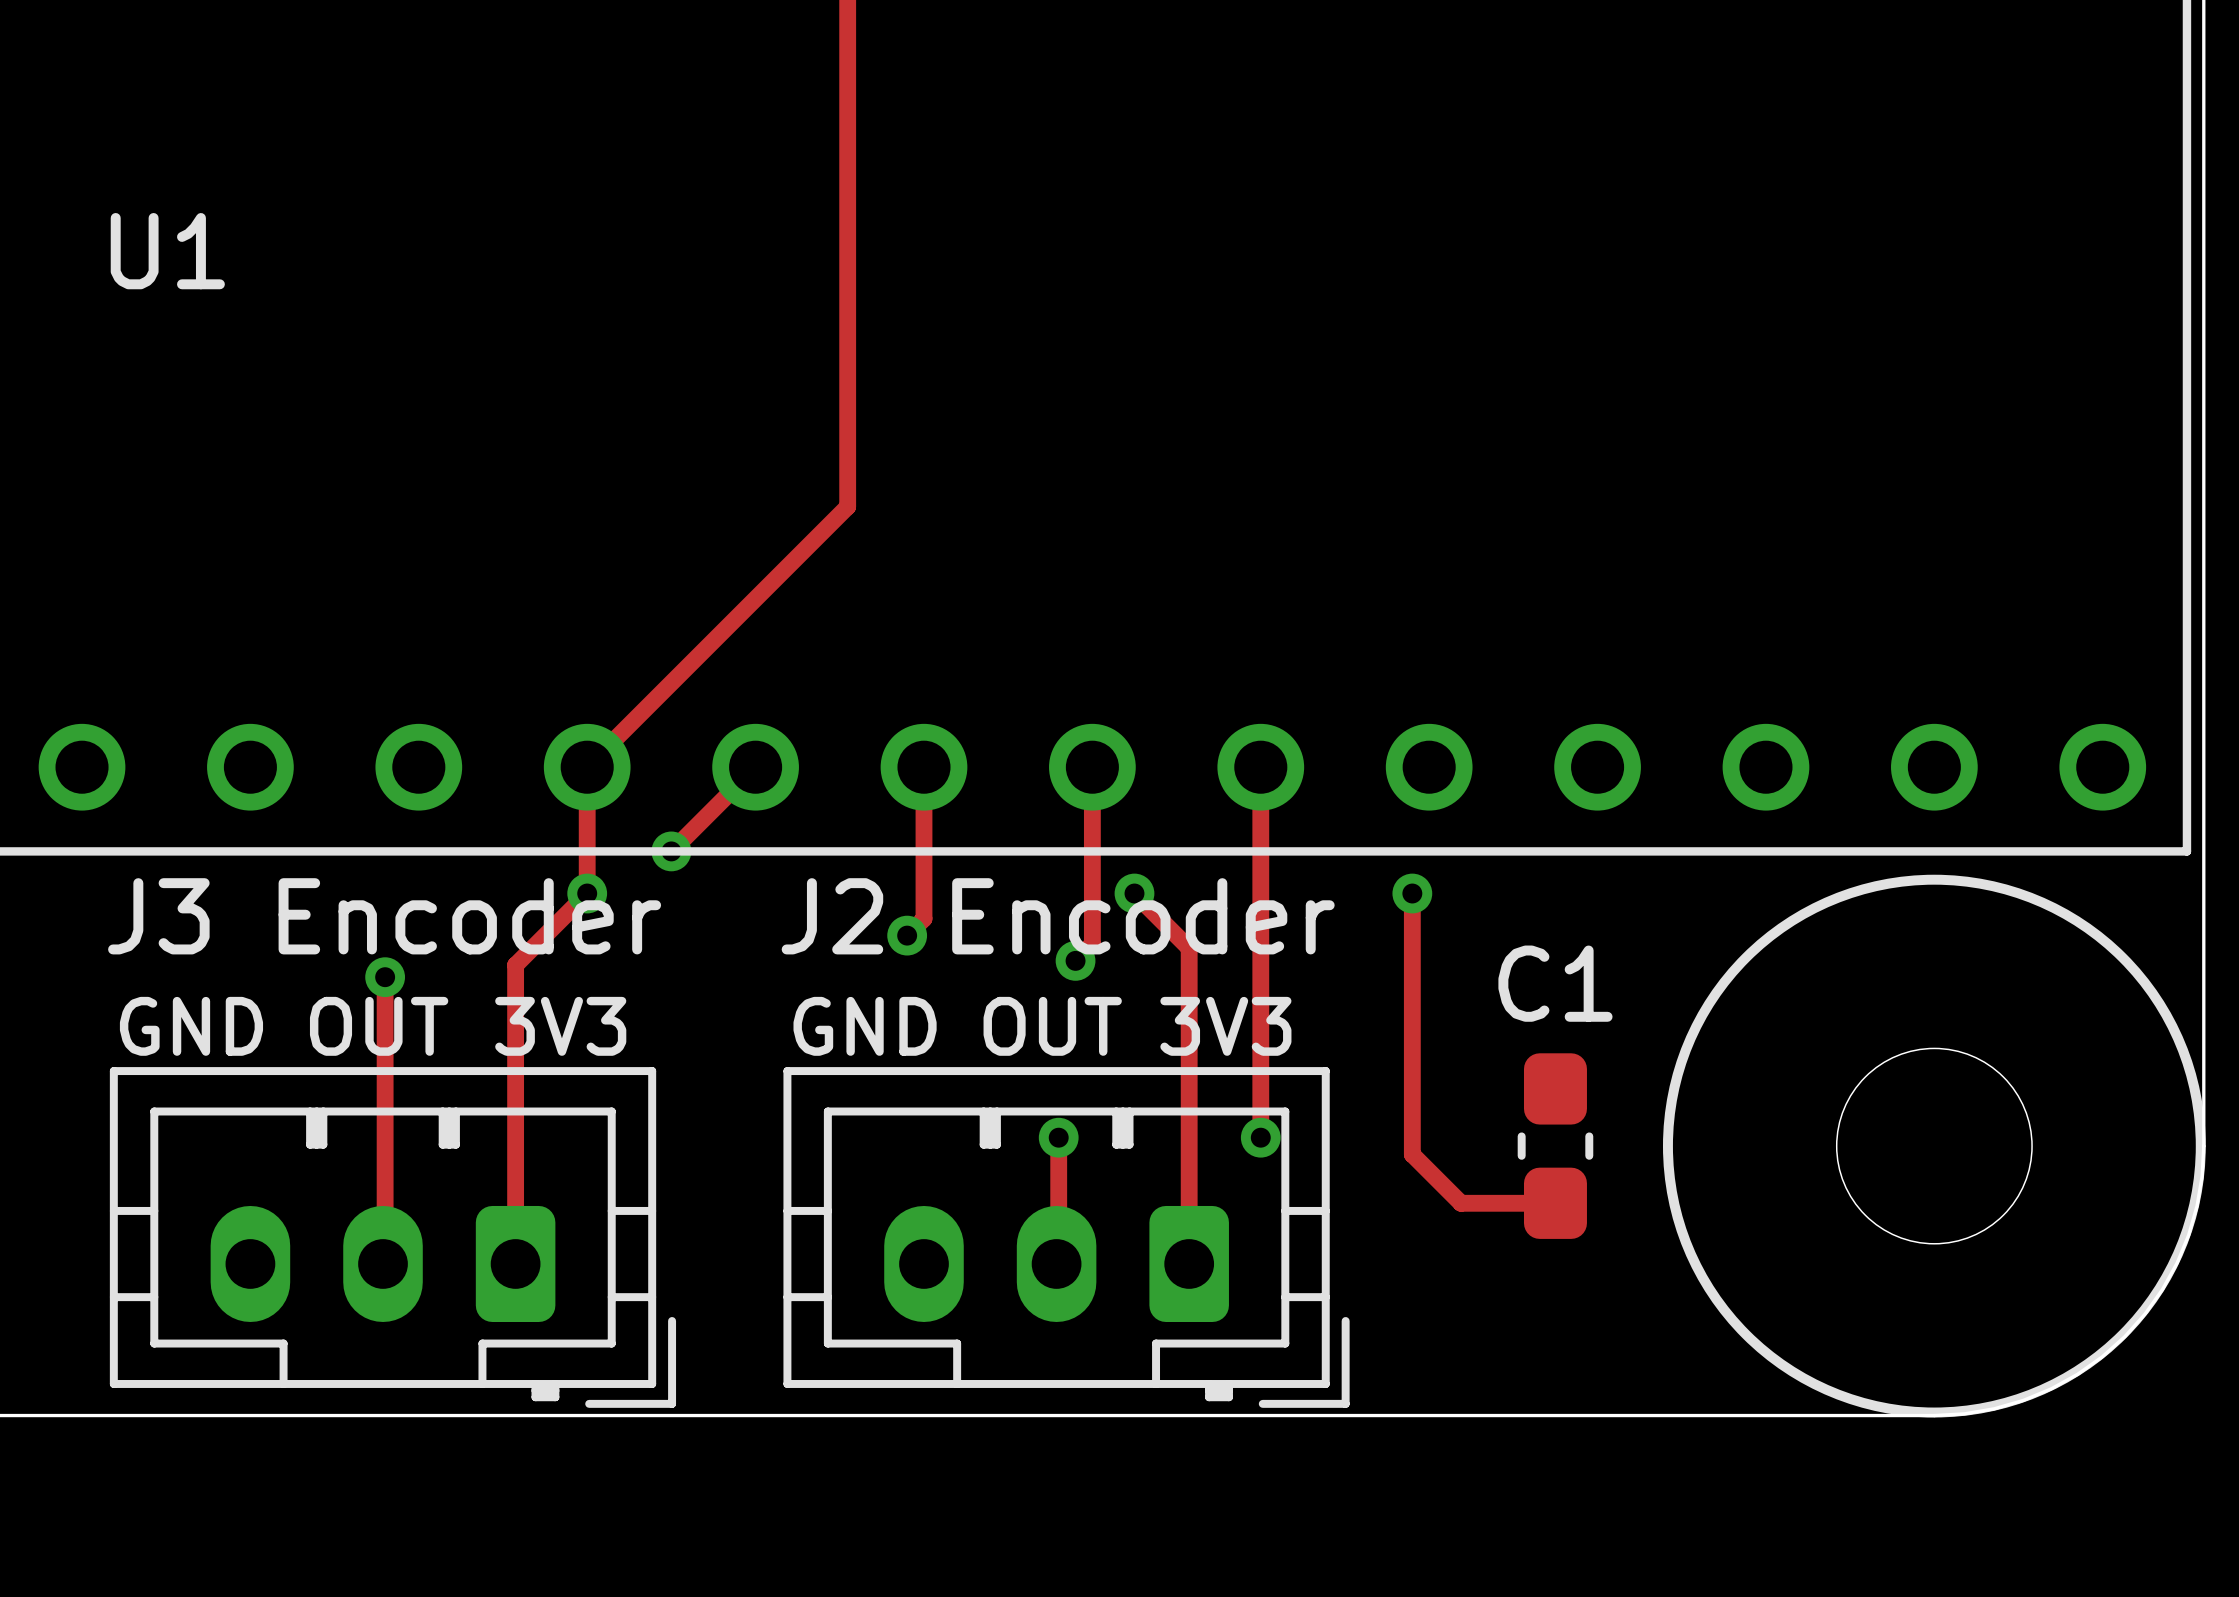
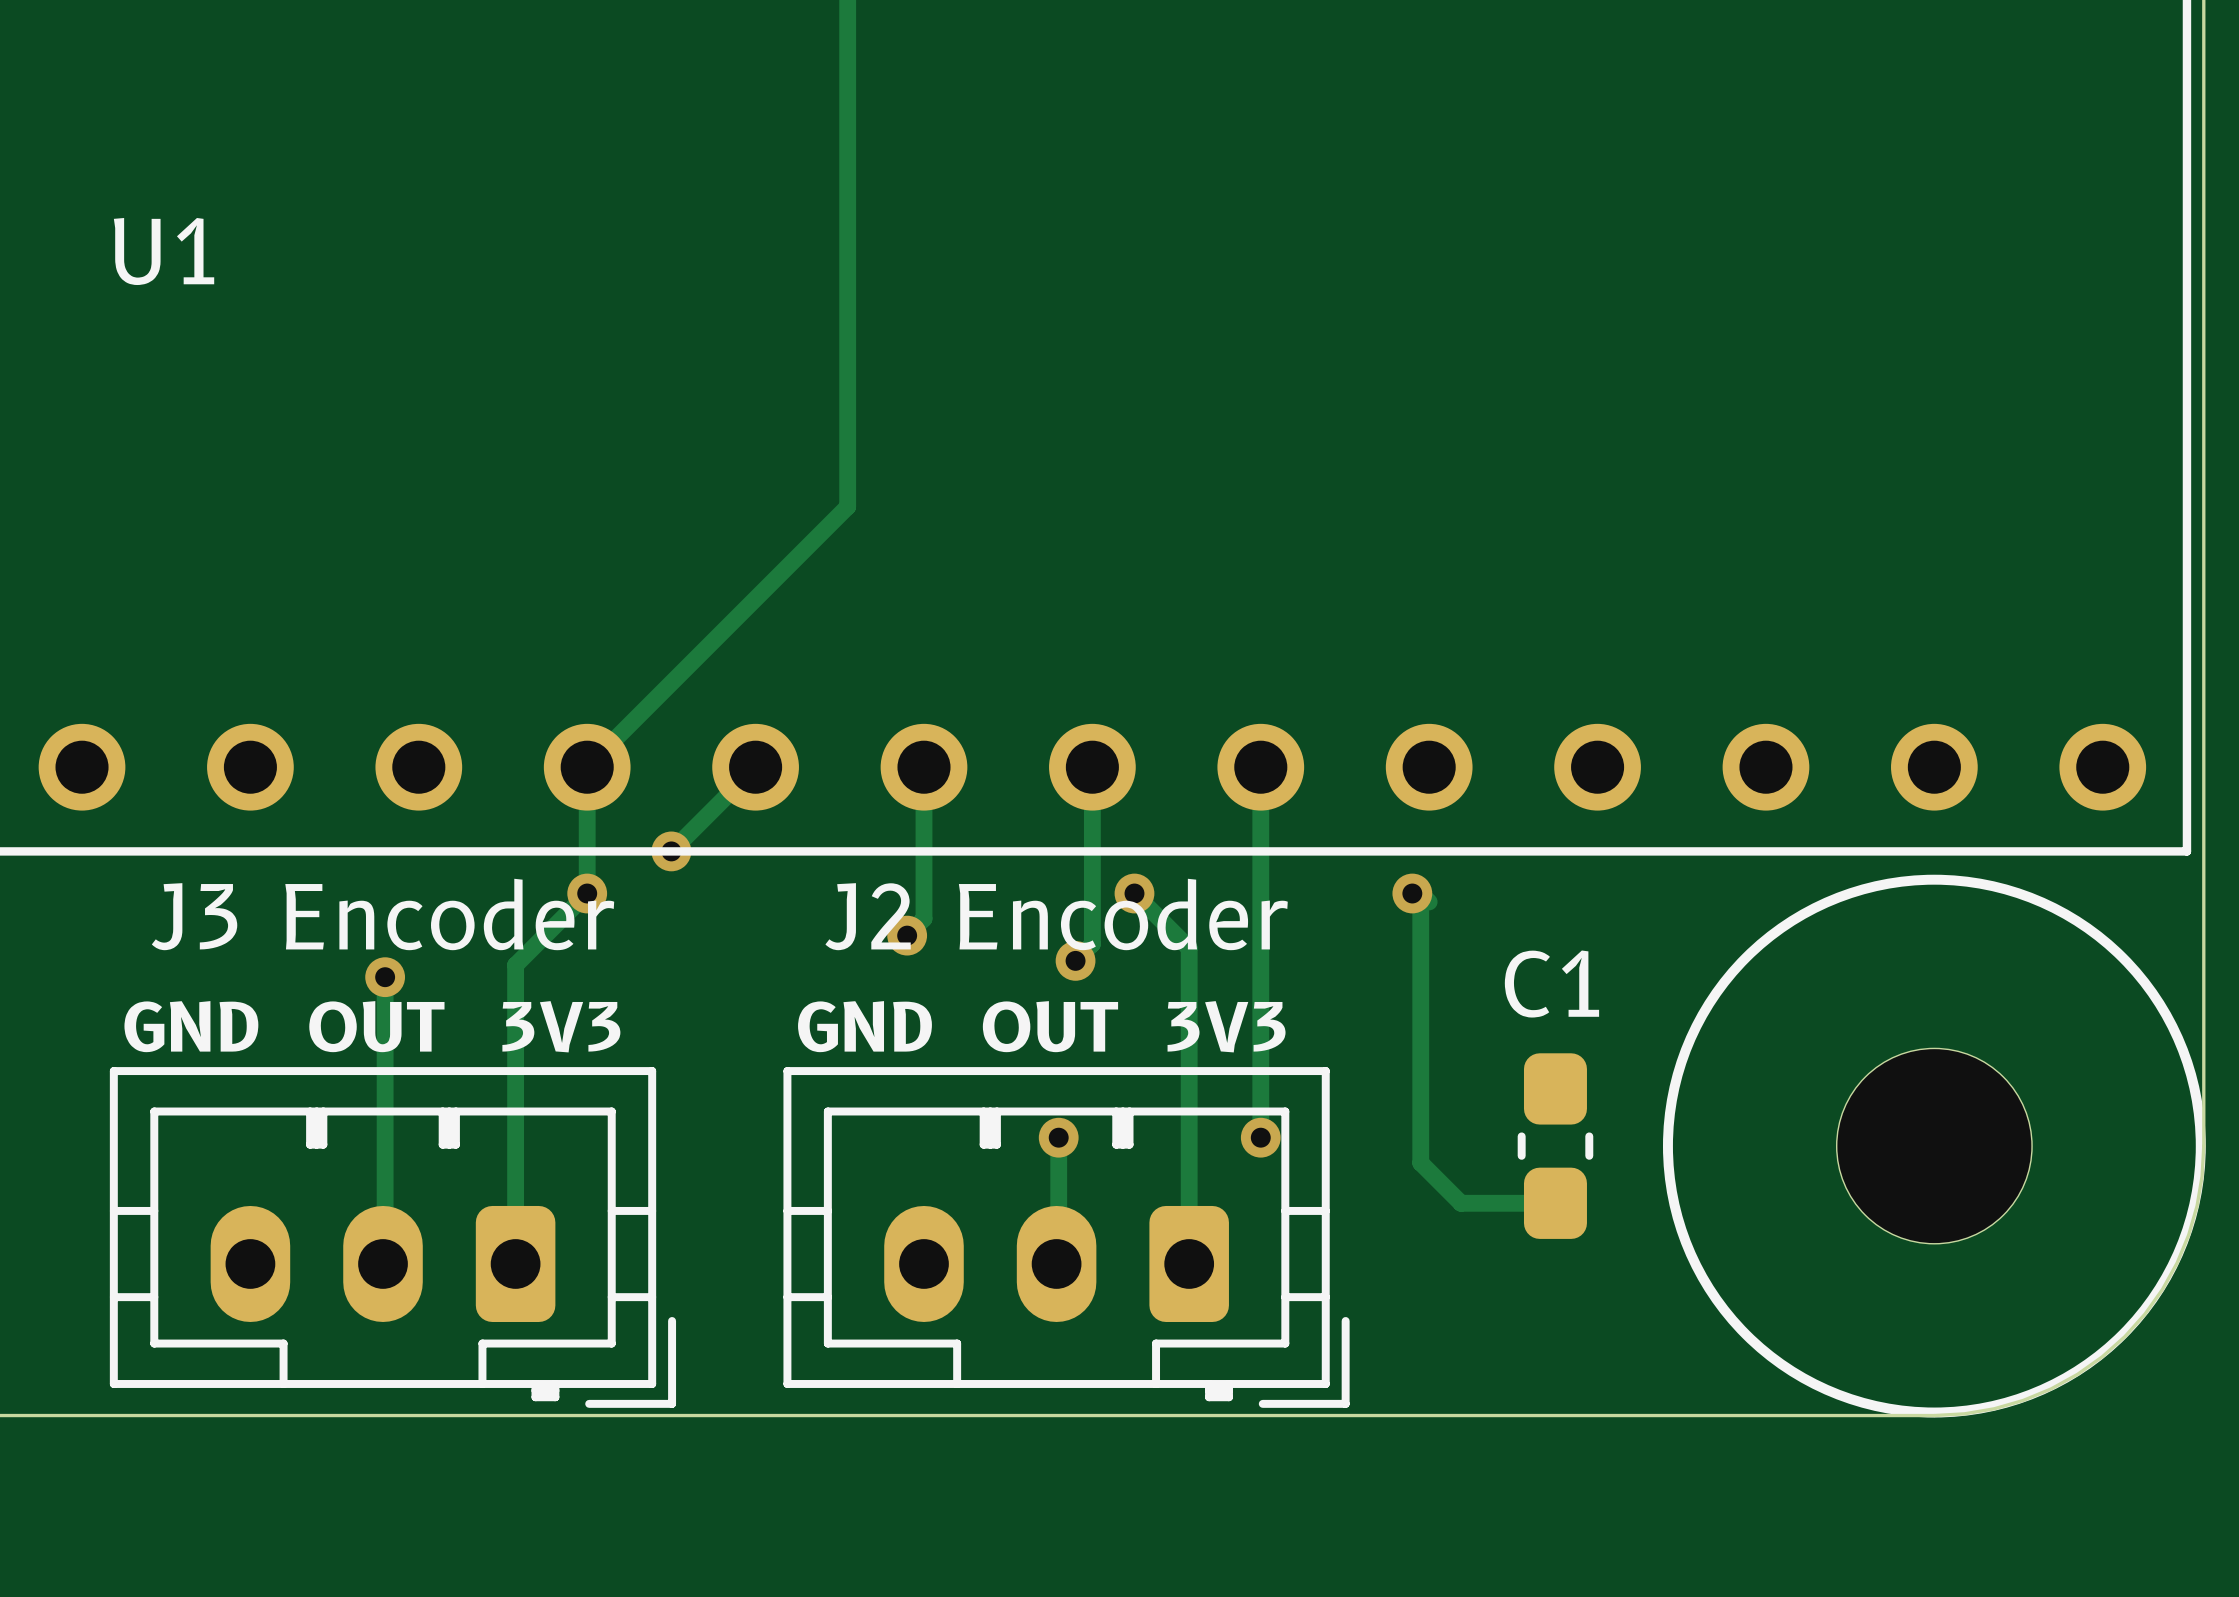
track: (1412, 893) (1412, 1154) (1420, 1162) -> (1429, 901) (1420, 893) (1420, 1162)

